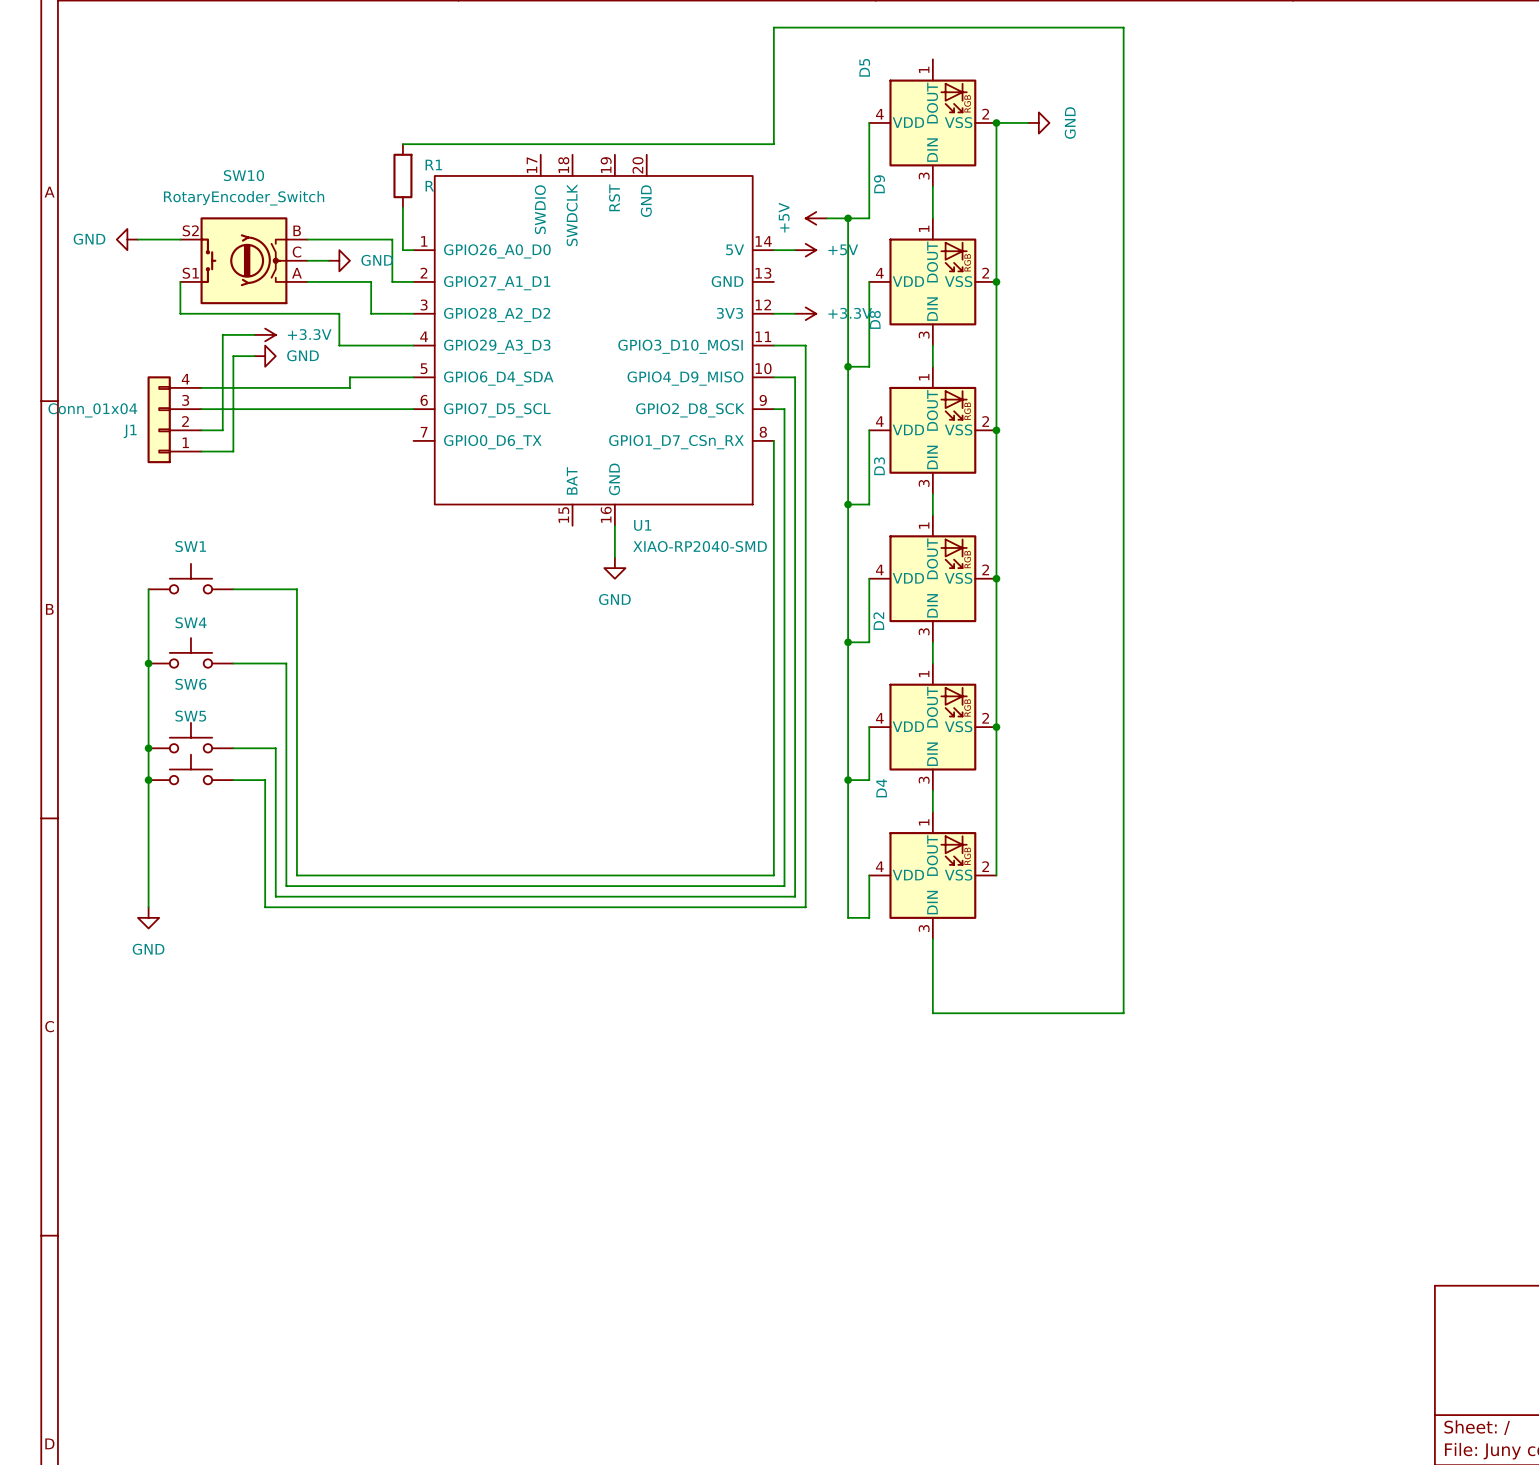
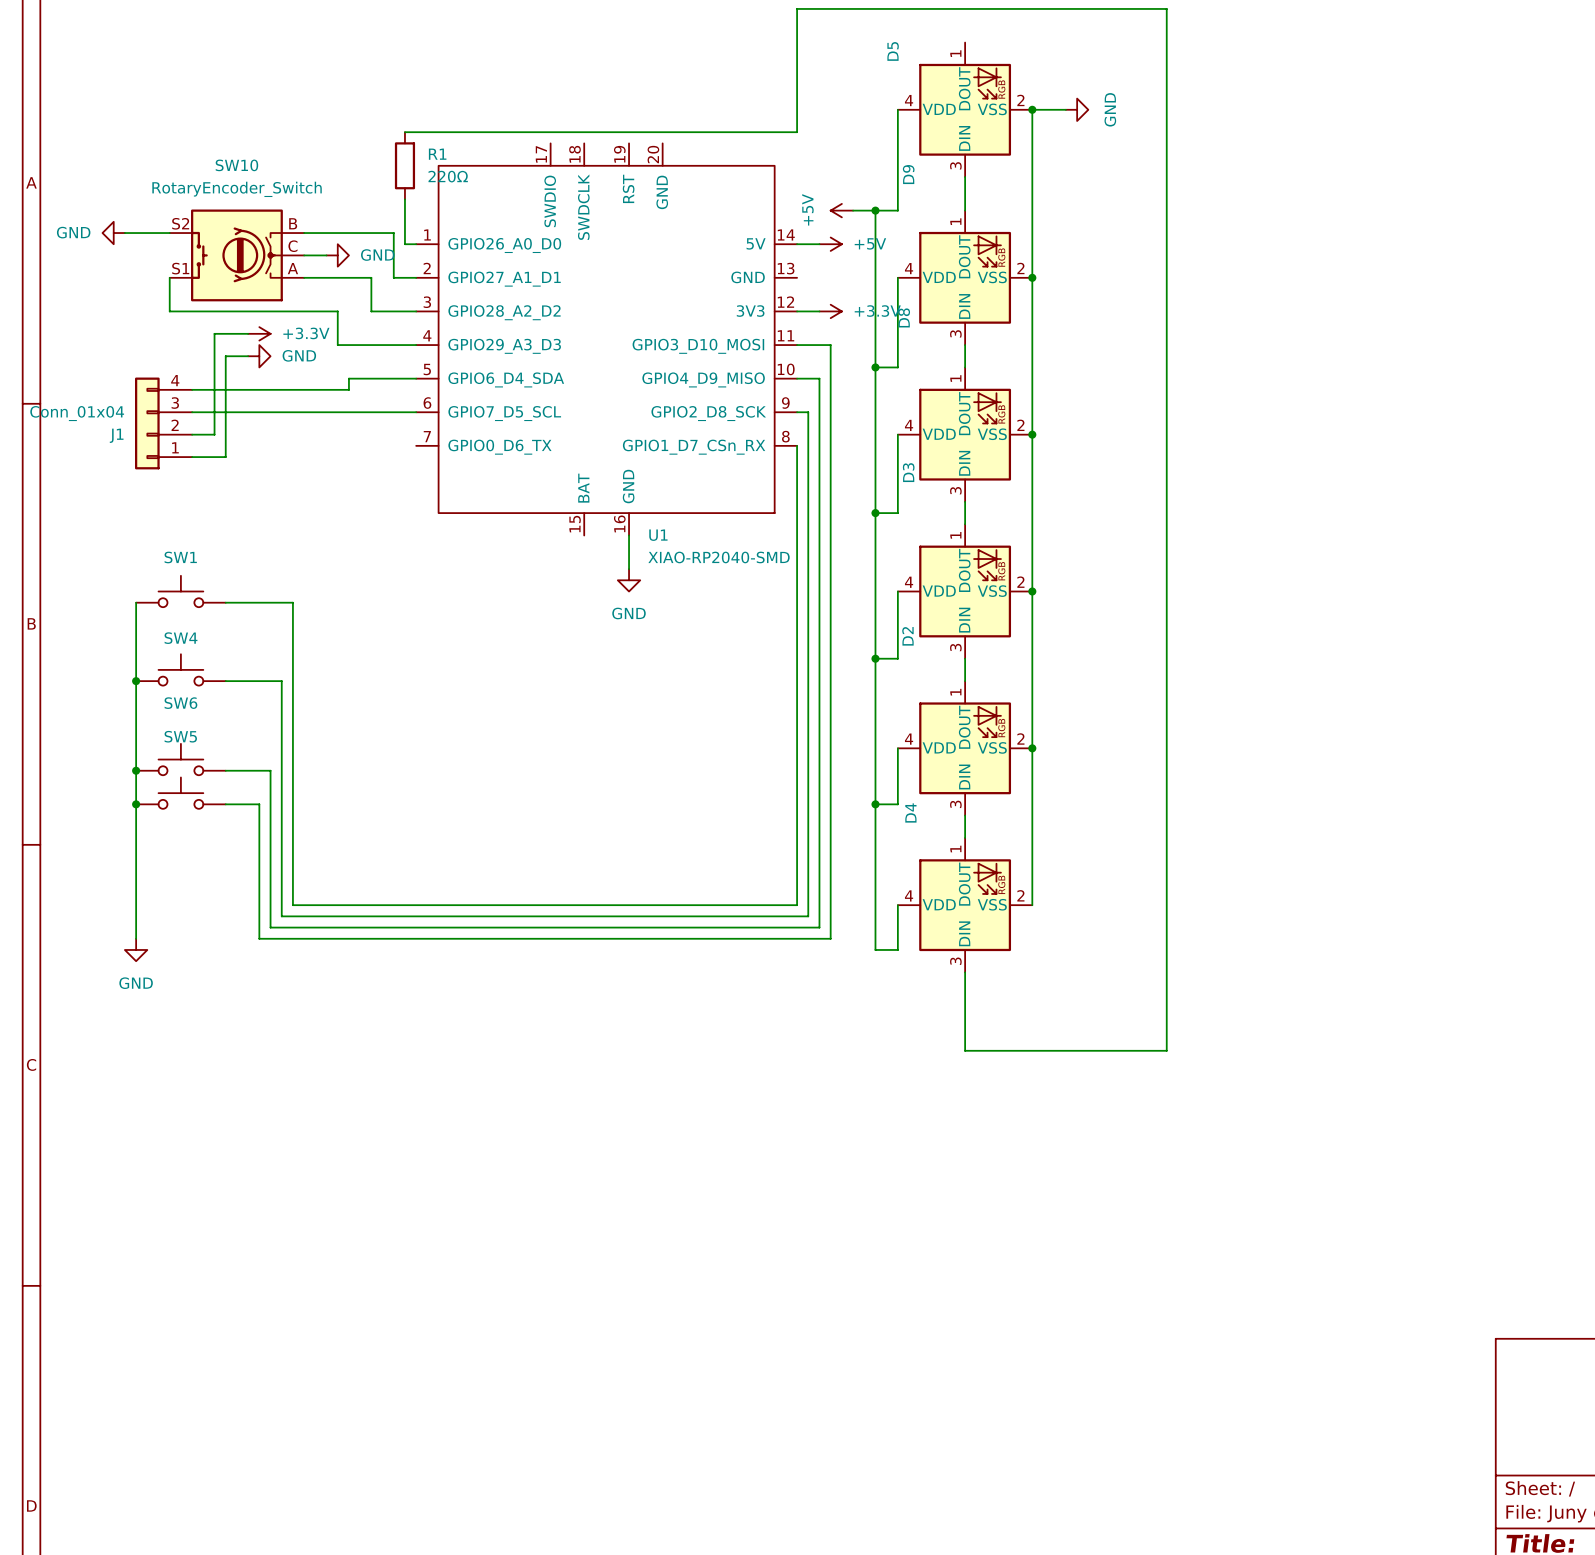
R1 value: R (429, 186) -> 220Ω (448, 176)

